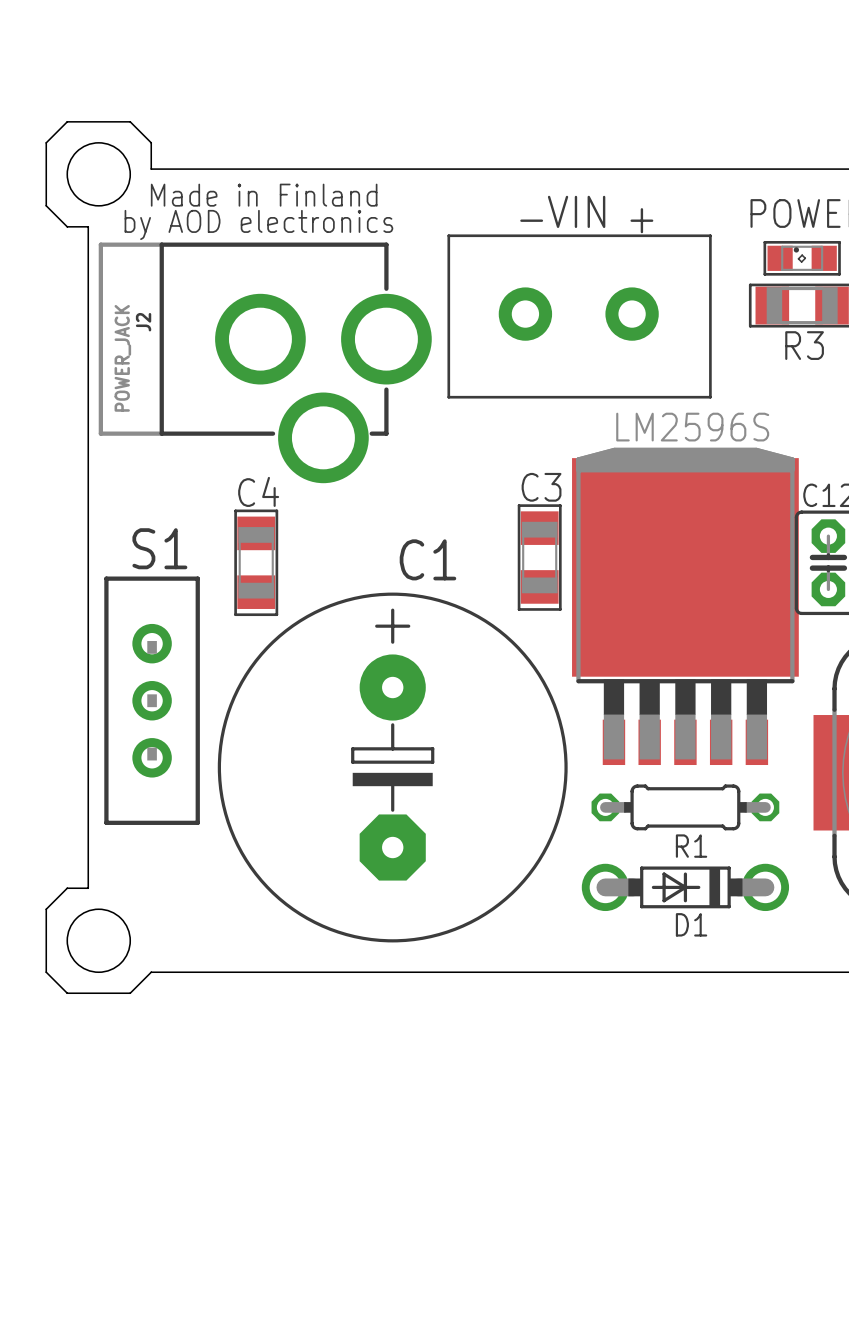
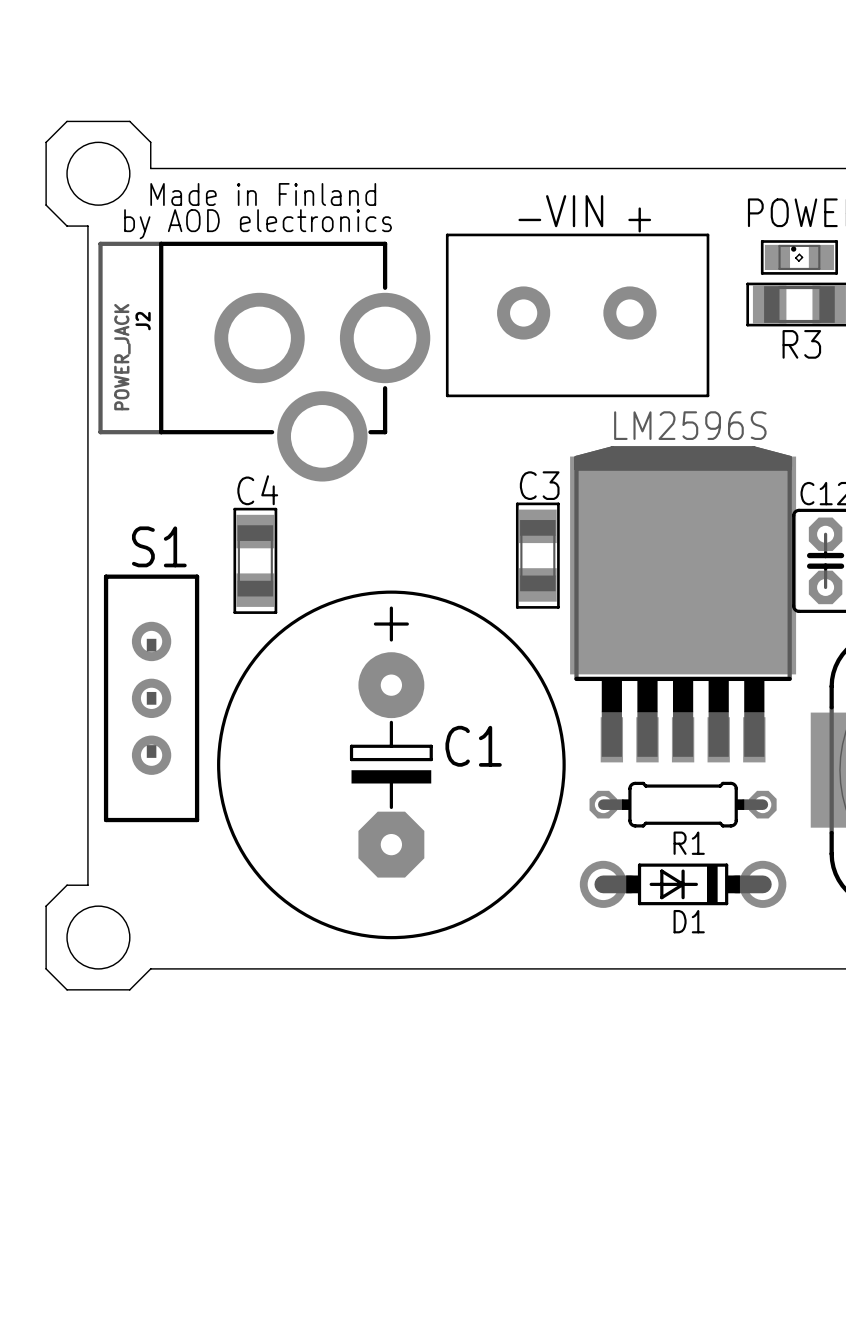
C1 name position: C1 (427, 559) -> C1 (473, 746)

